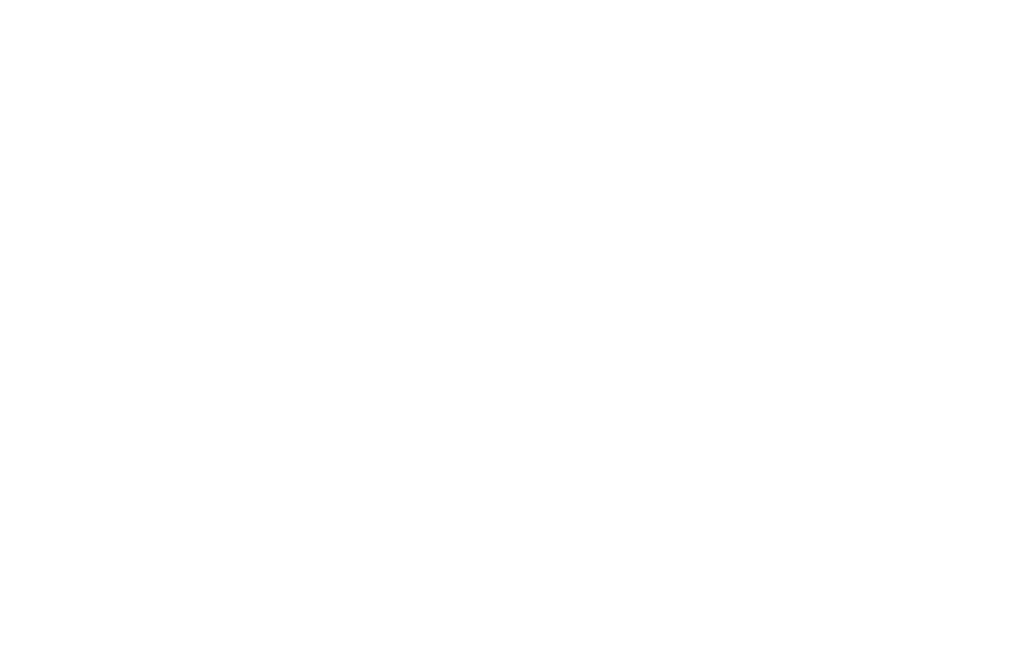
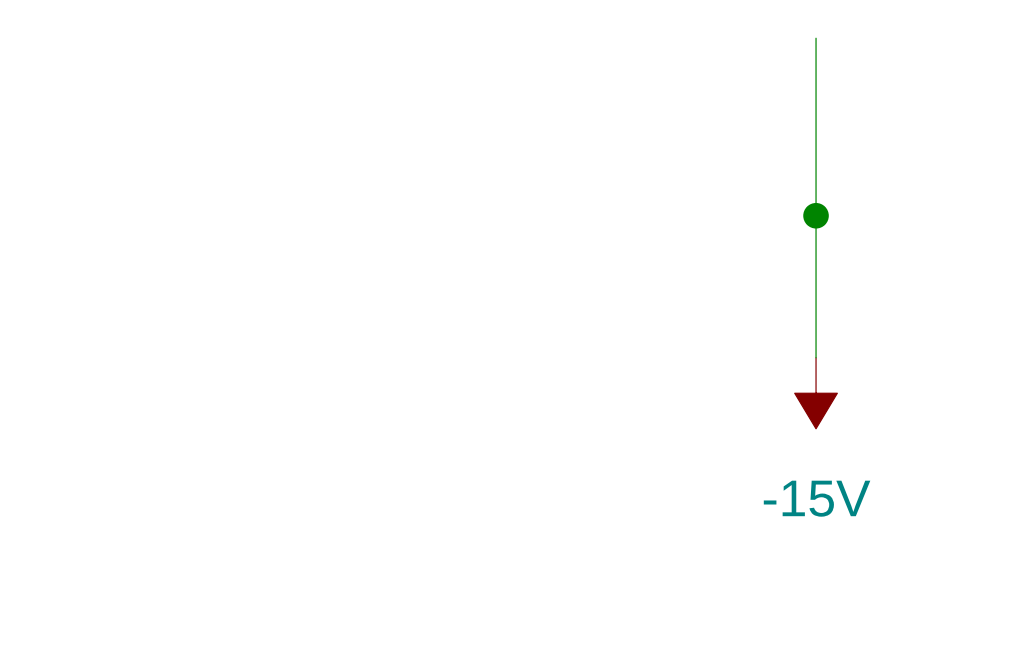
wire: none -> (816, 38) (816, 357)
junction: none -> (816, 215)
power symbol: none -> -15V (816, 393)

